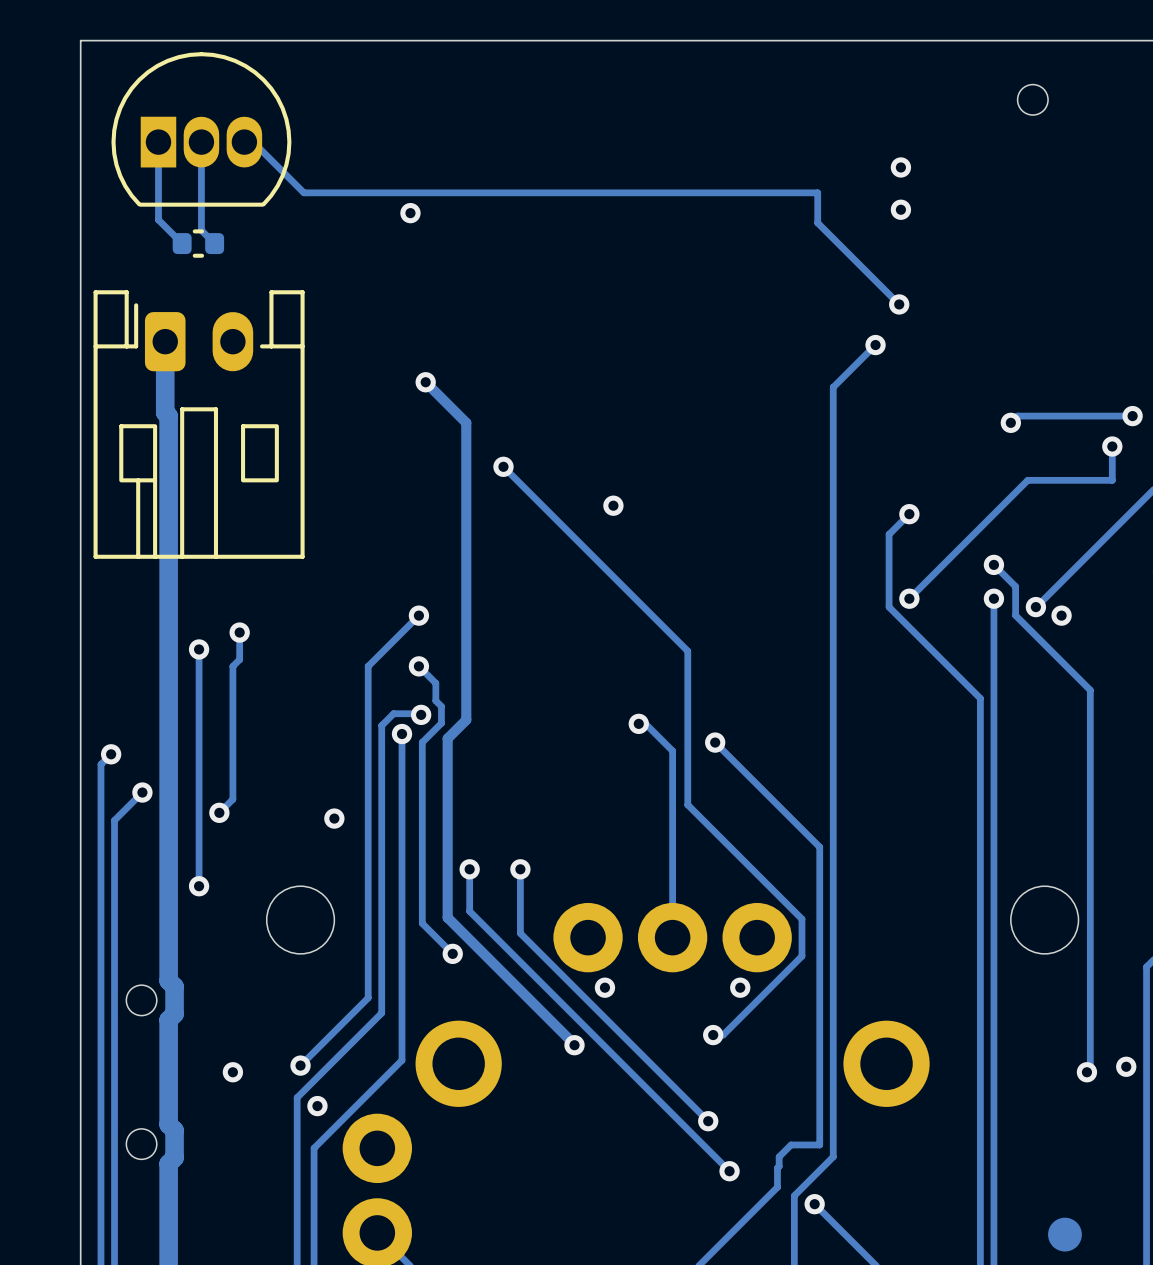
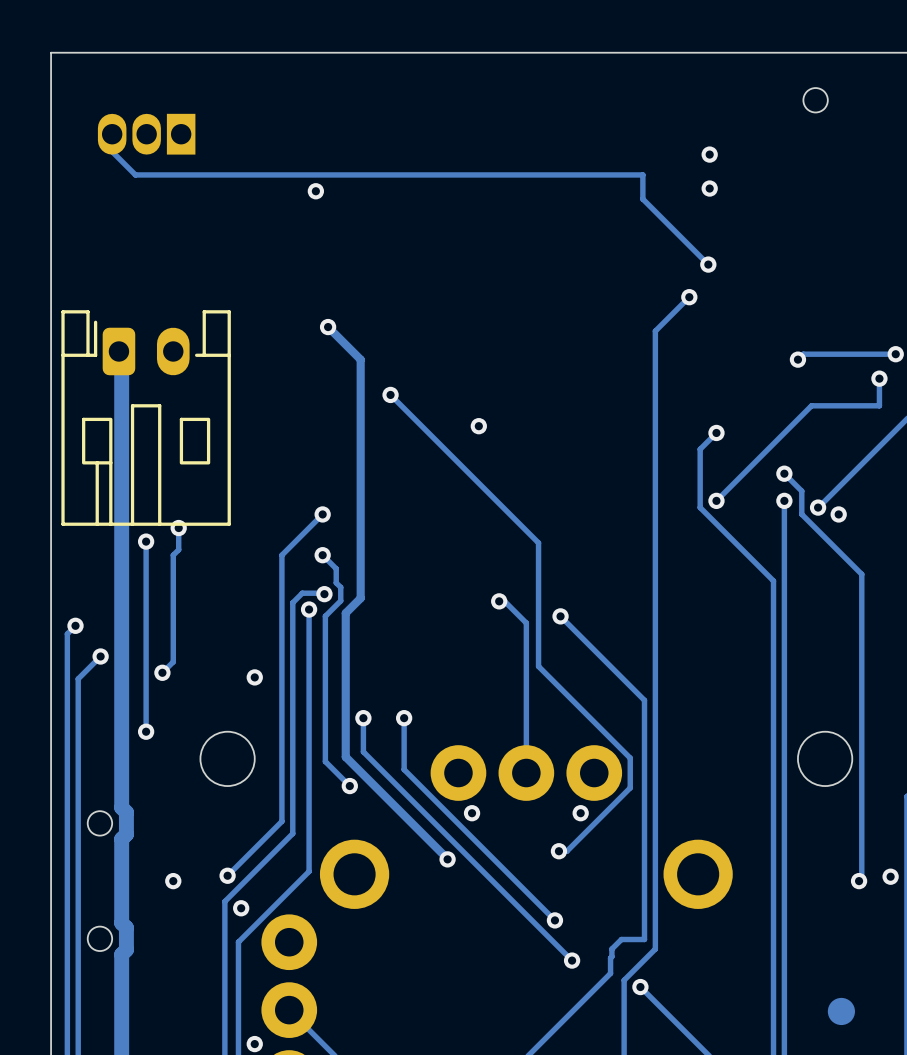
part side: bottom (201, 129) -> top (146, 134)
track: (158, 142) (158, 219) (182, 243) -> none
track: (201, 142) (201, 230) (214, 243) -> none
track: (244, 142) (253, 142) (303, 192) -> (112, 151) (135, 174) (230, 174)
part: (198, 243) -> none
track: (165, 341) (165, 412) -> none
part position: (199, 424) -> (146, 418)

